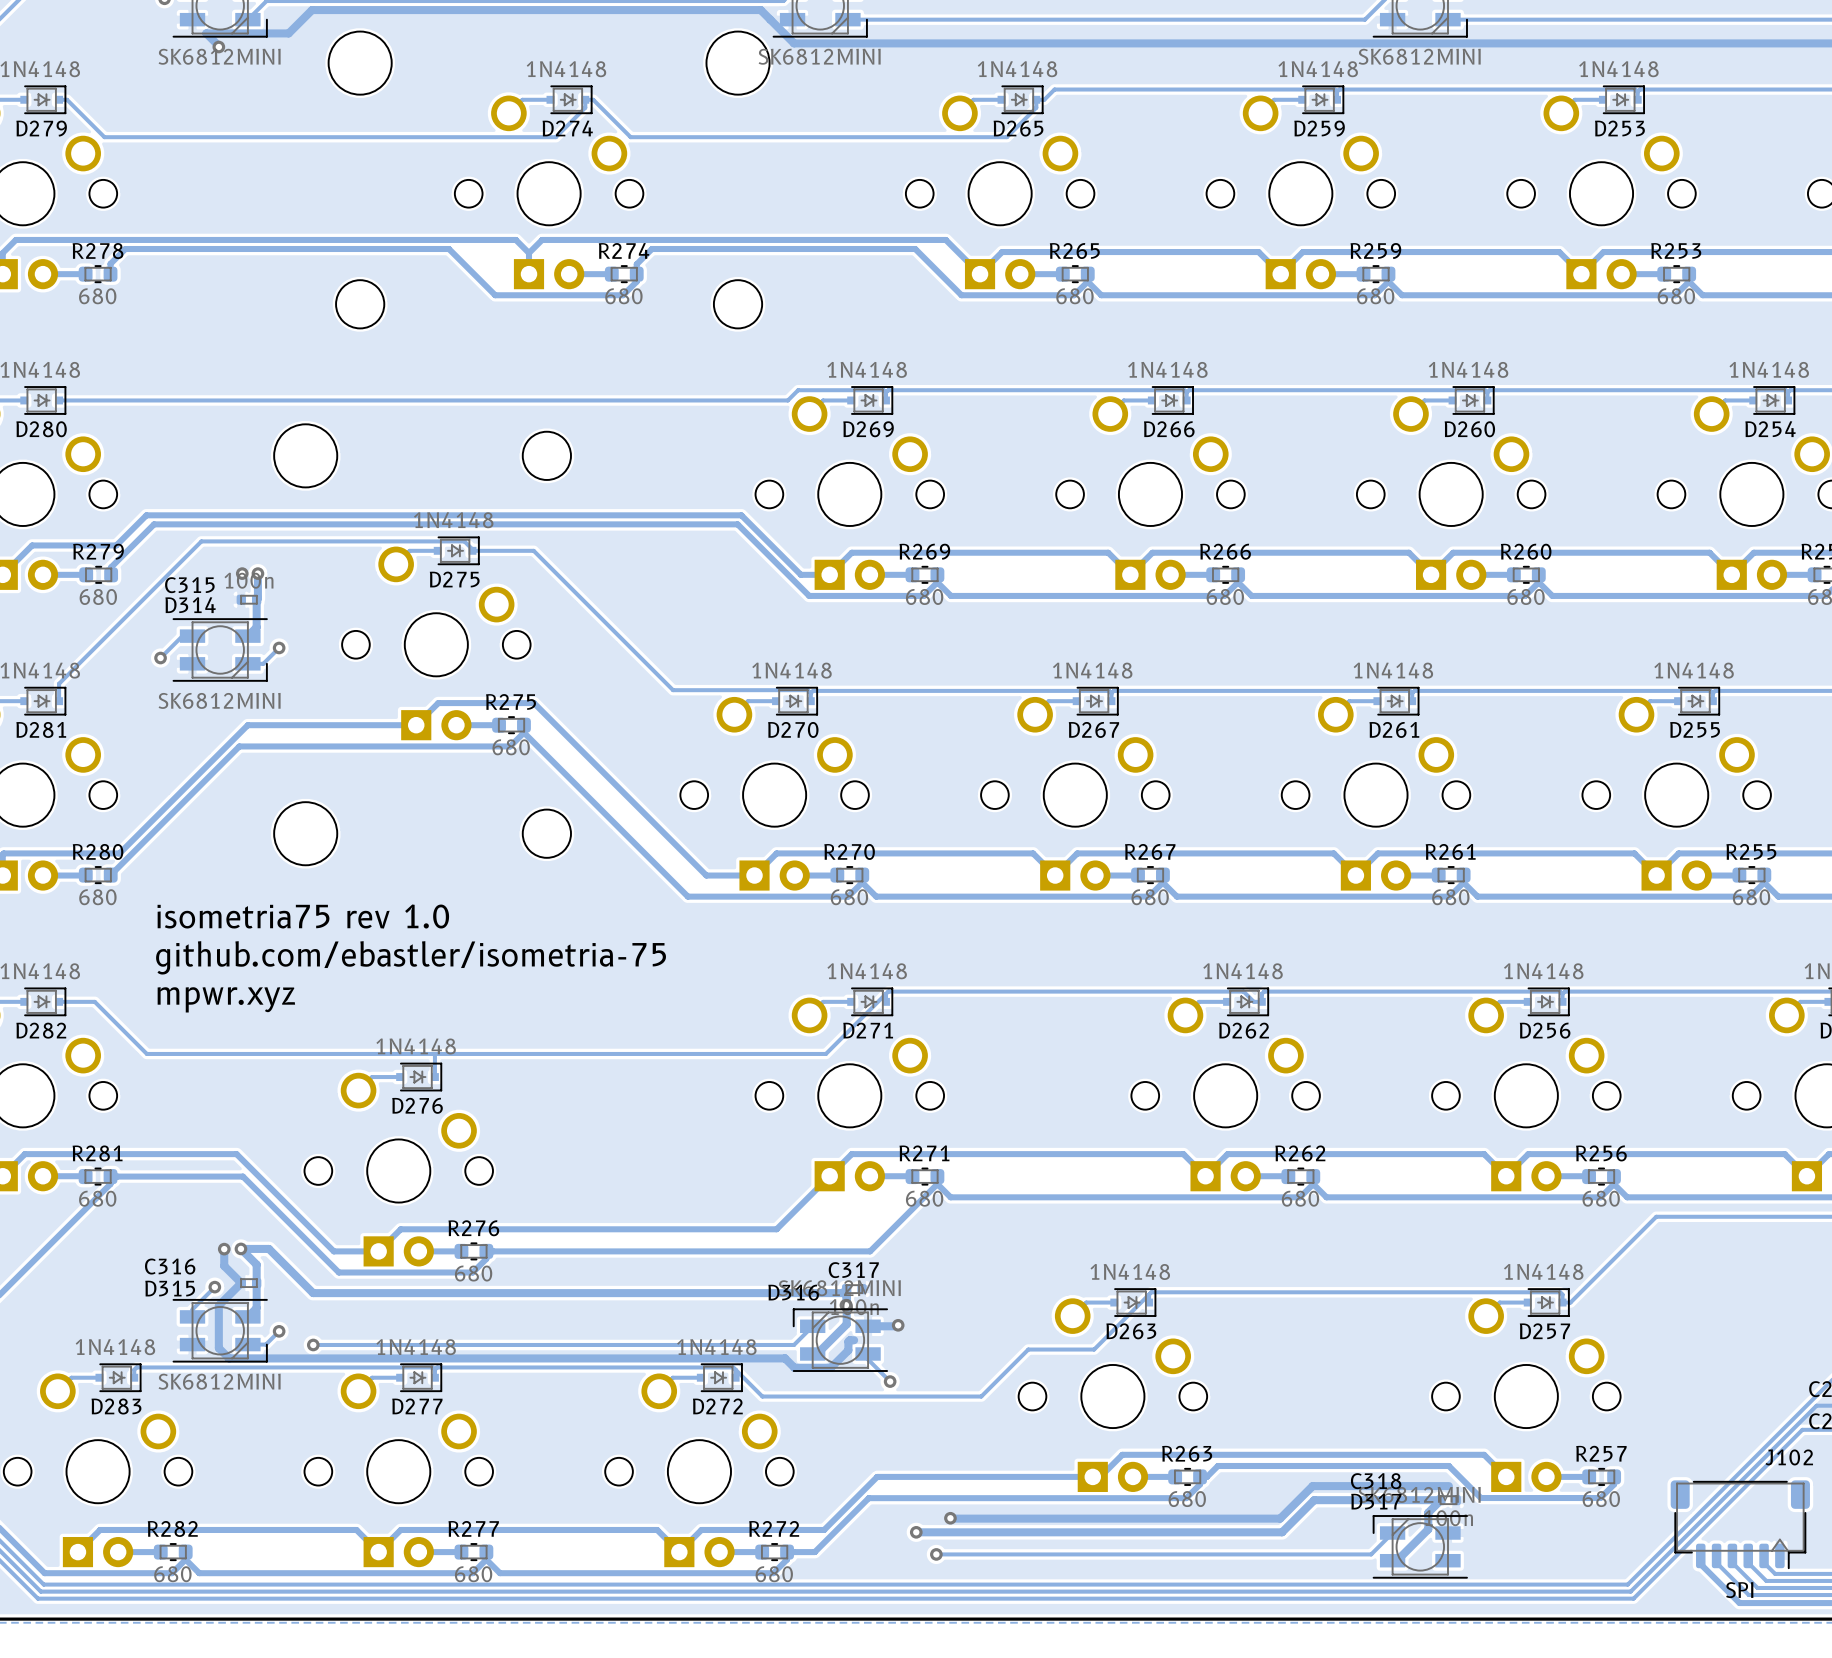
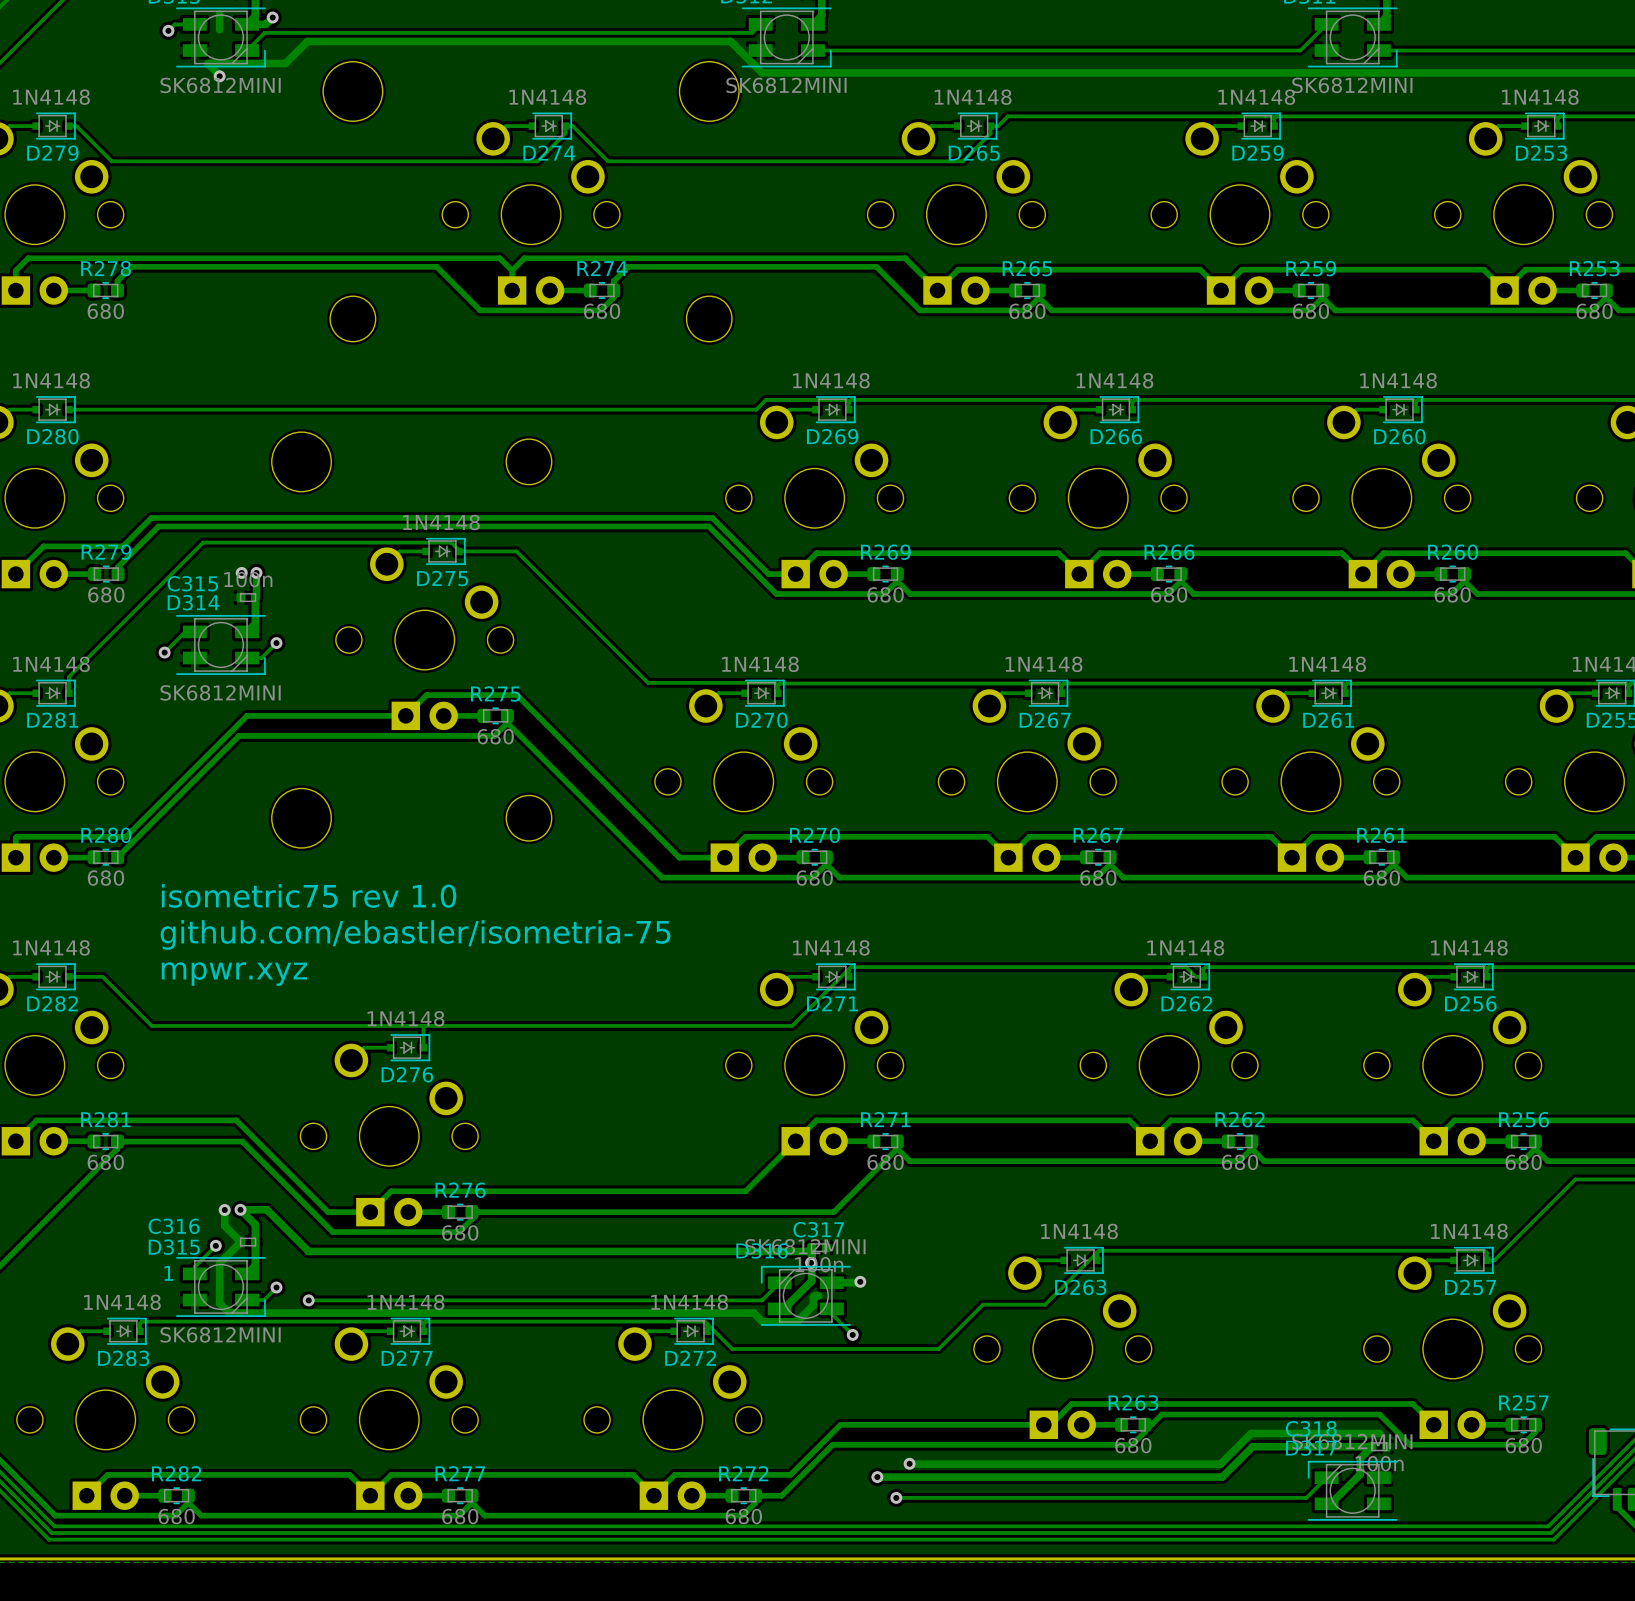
text: isometria75 rev 1.0 (303, 916) -> isometric75 rev 1.0 (309, 895)
D315 text: none -> 1 (168, 1273)

